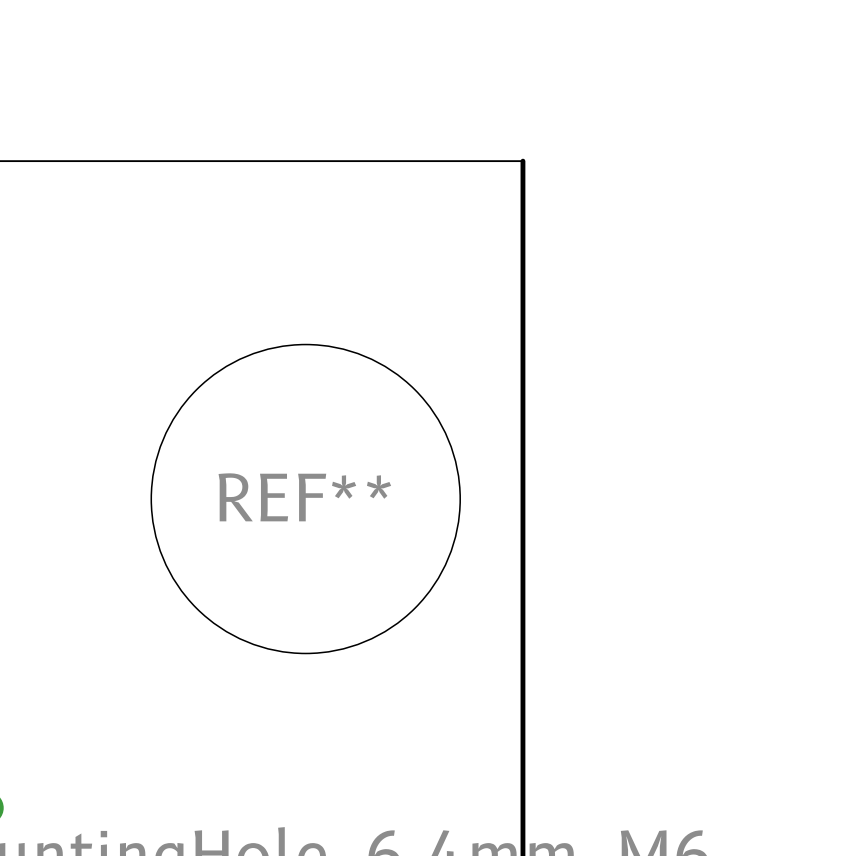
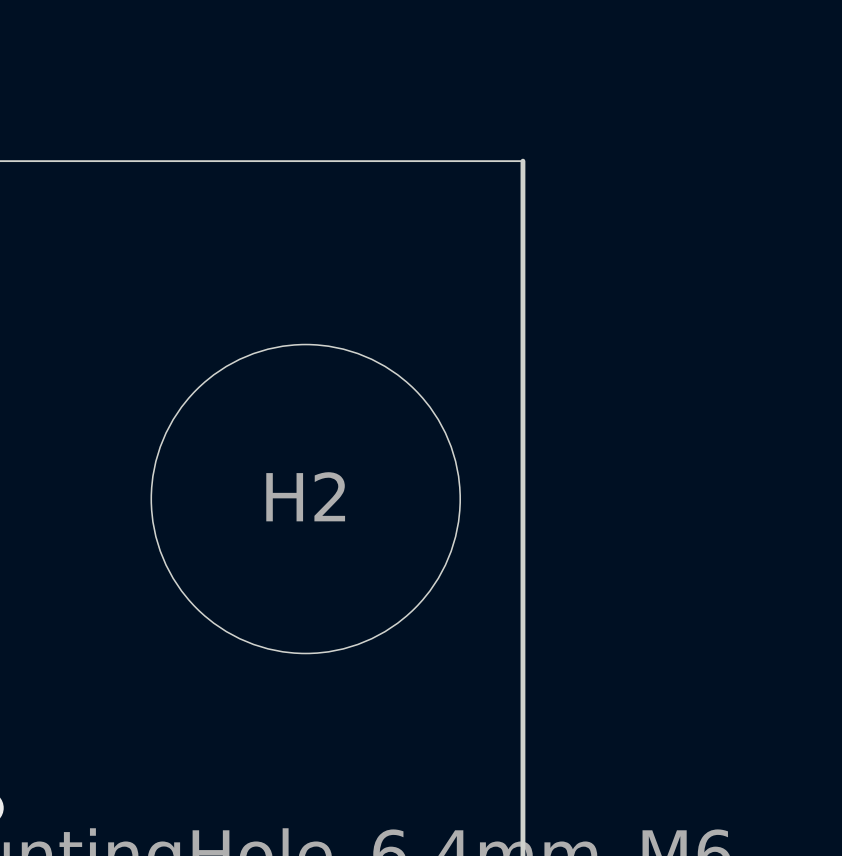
REF** name: REF** (304, 497) -> H2 (305, 496)

